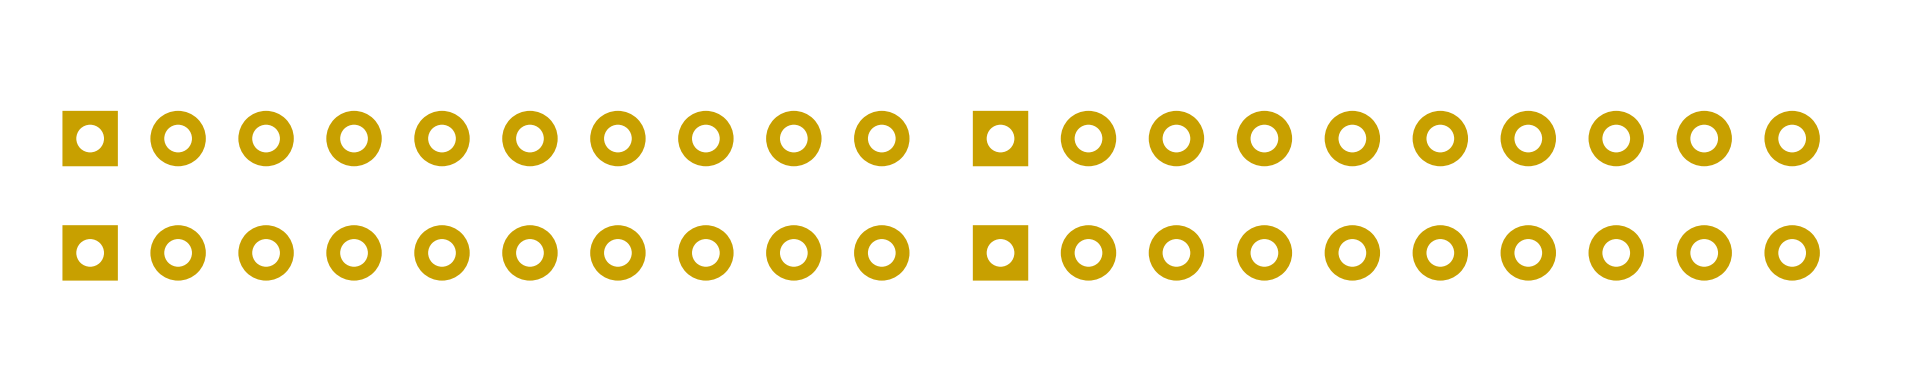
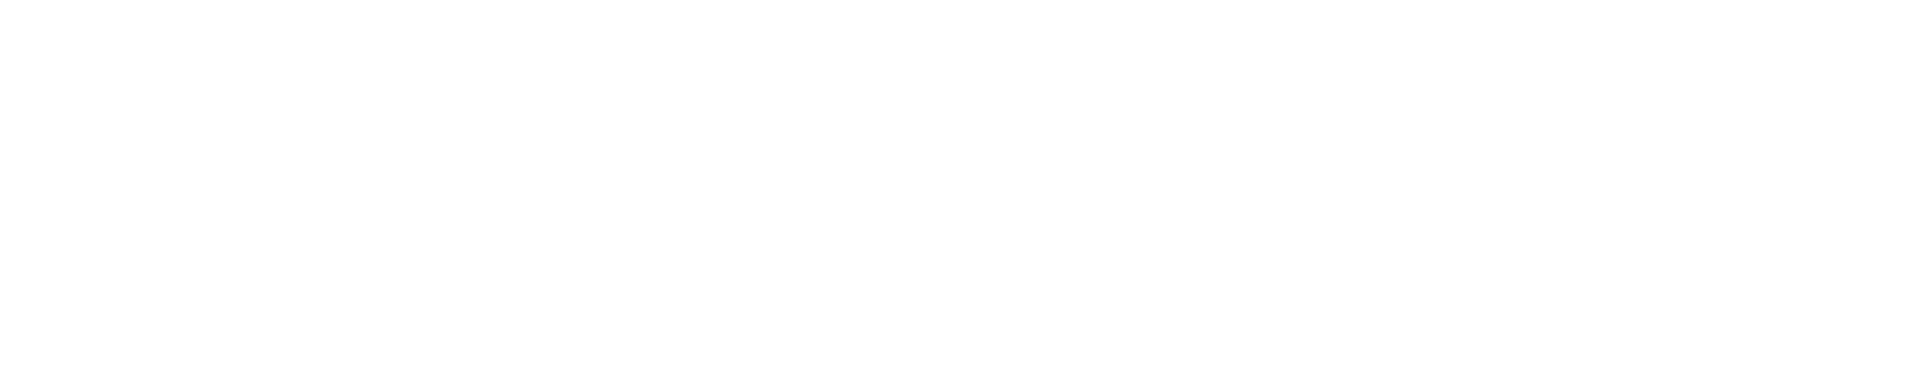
part: (485, 138) -> none
part: (1396, 138) -> none
part: (485, 252) -> none
part: (1396, 252) -> none

